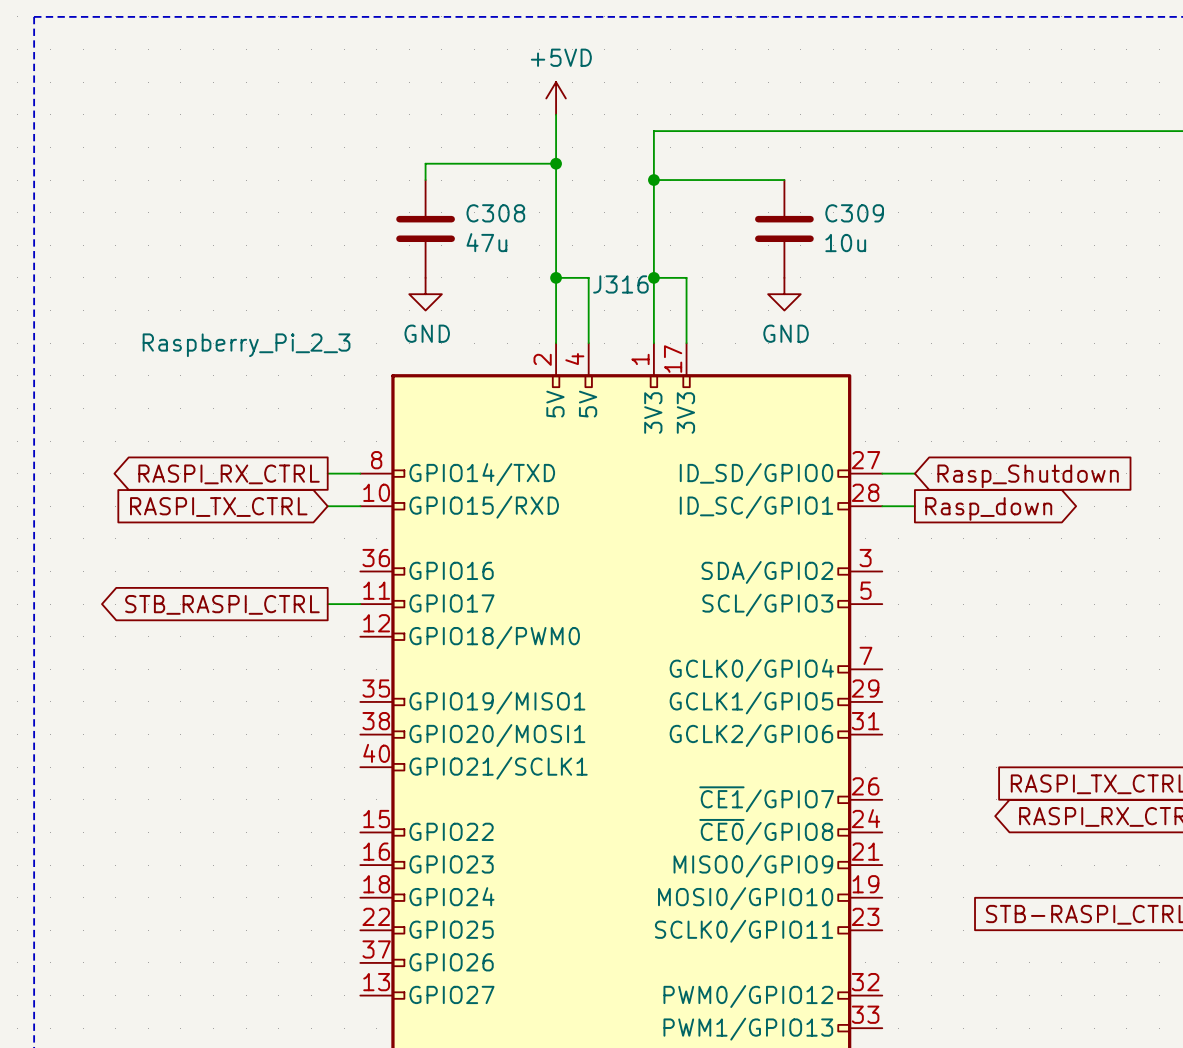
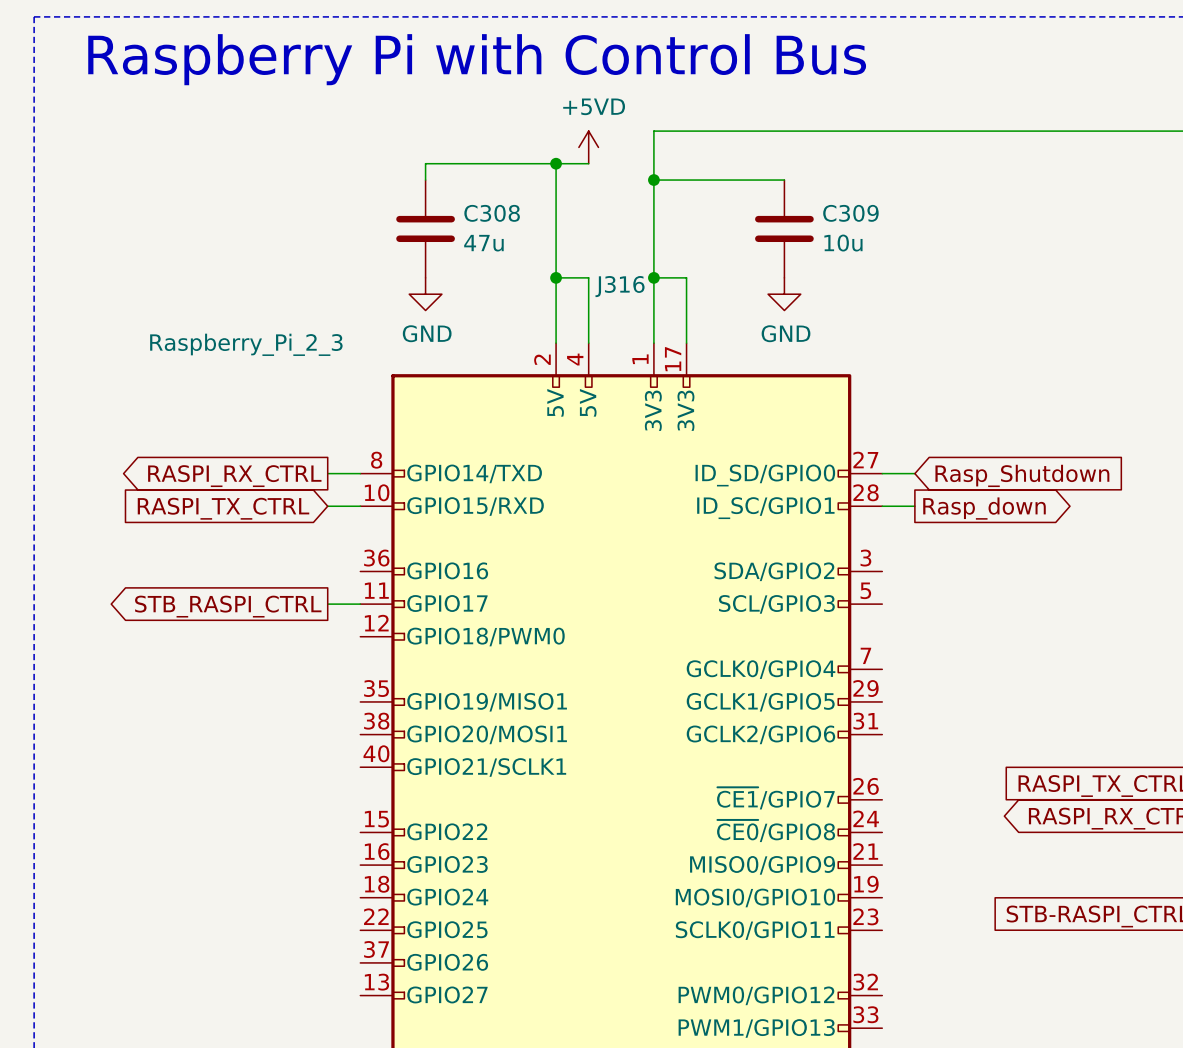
text: none -> Raspberry Pi with Control Bus (477, 59)
power symbol position: +5VD (556, 98) -> +5VD (588, 147)
wire: (556, 114) (556, 163) -> (588, 163) (556, 163)

